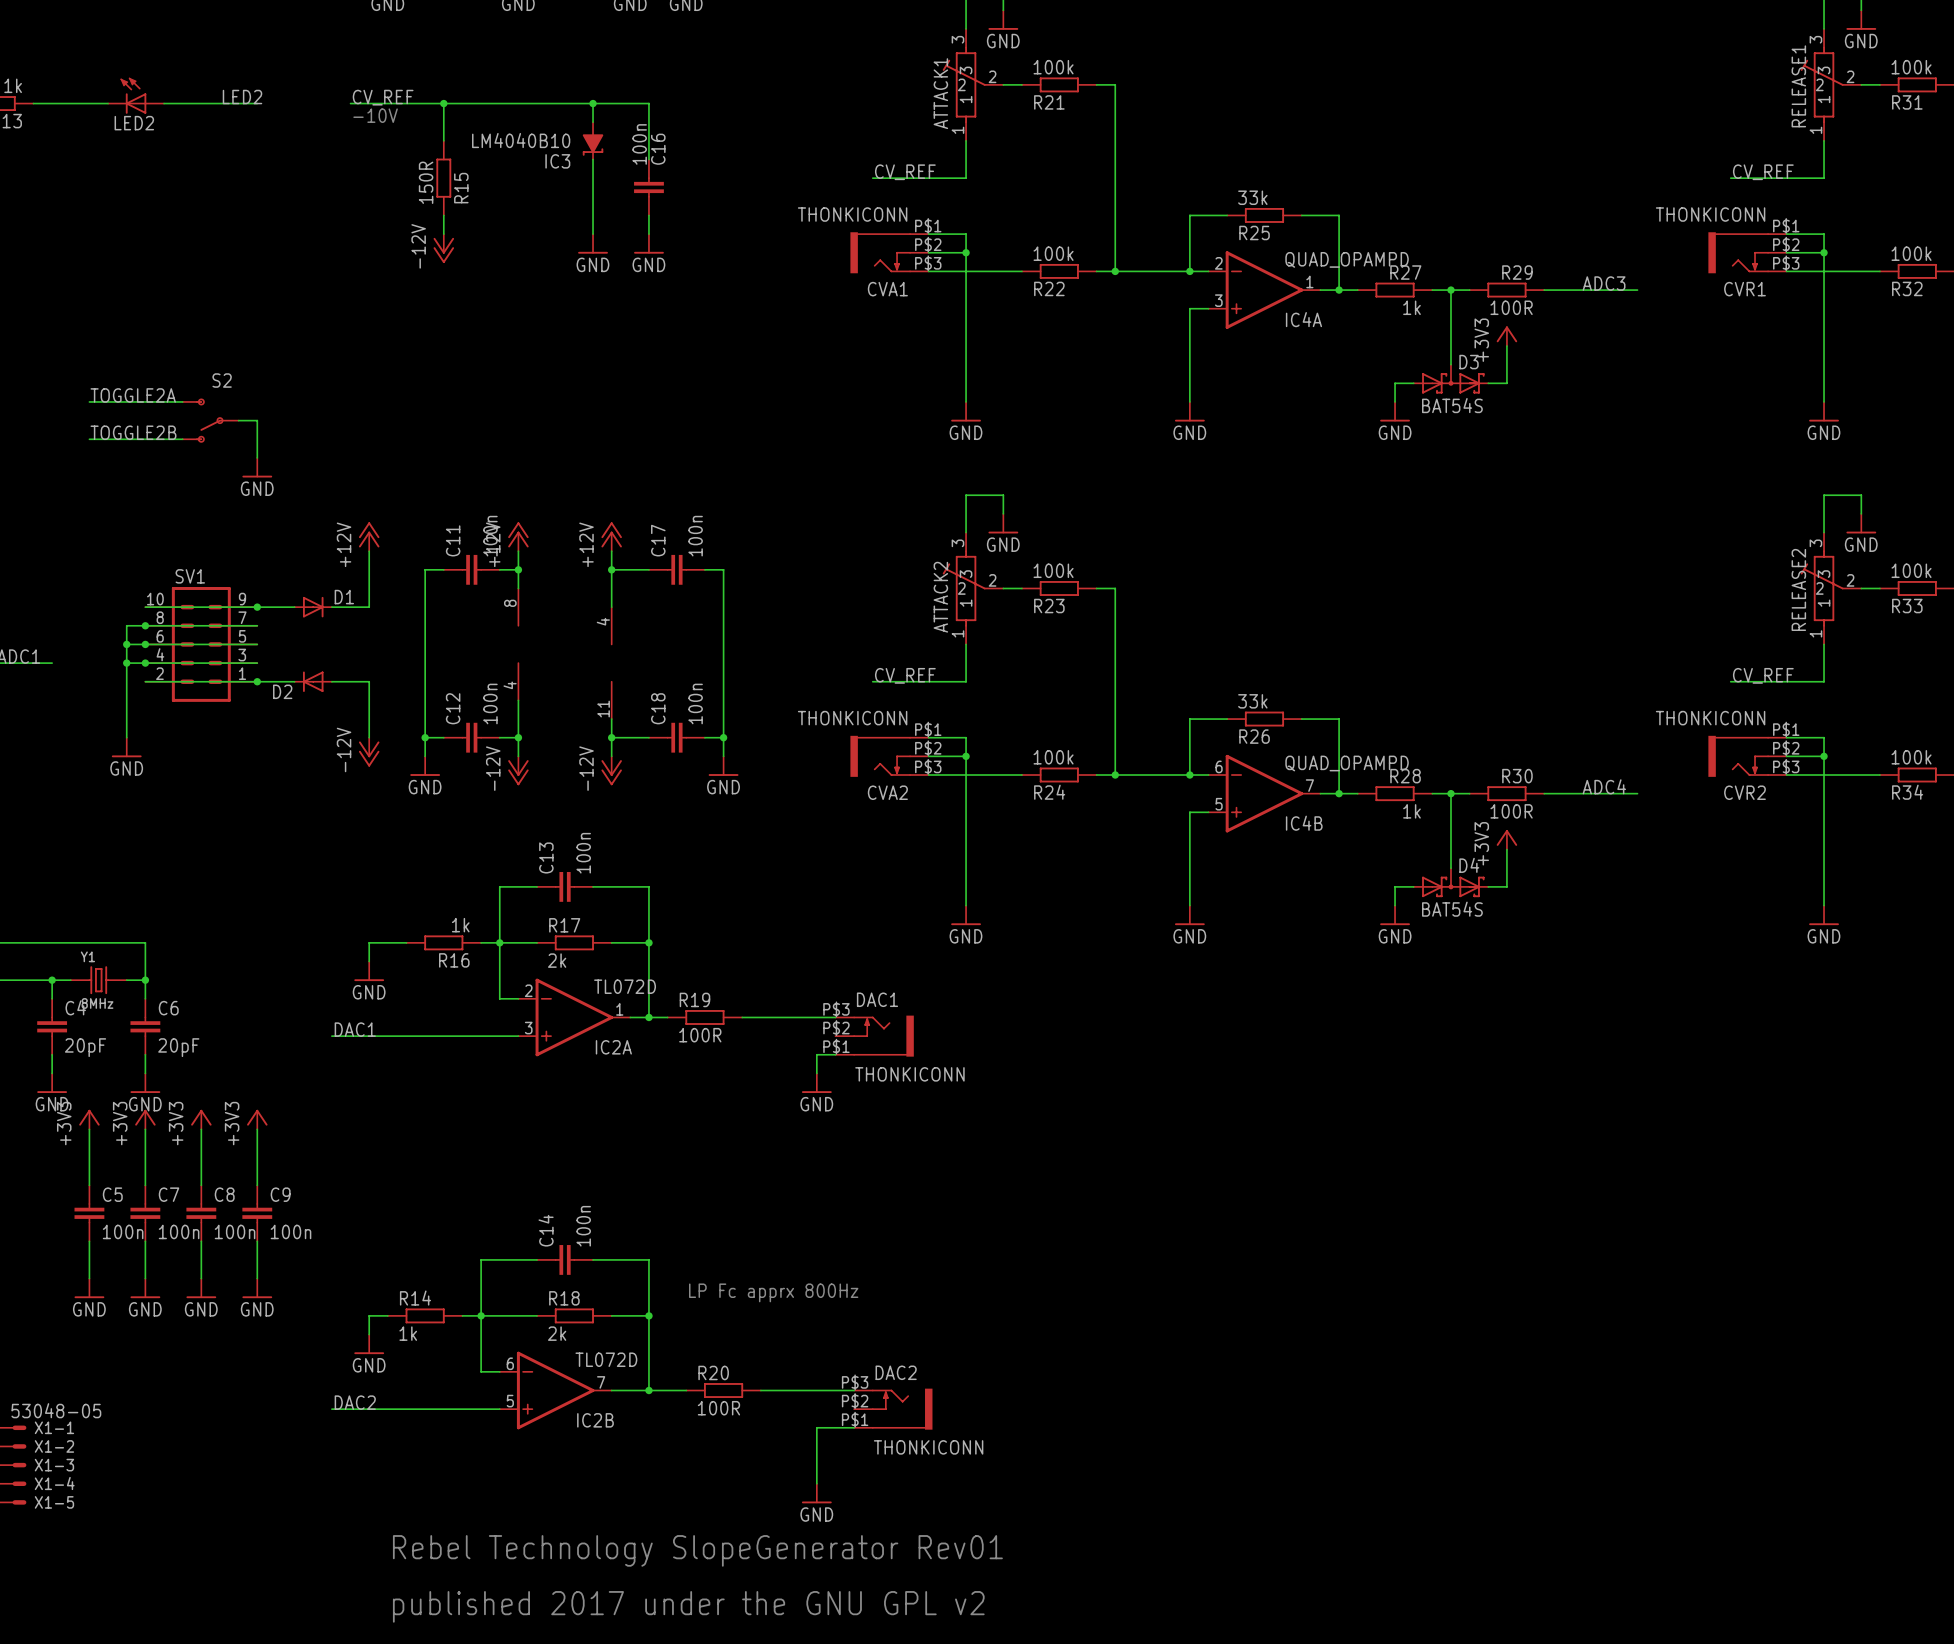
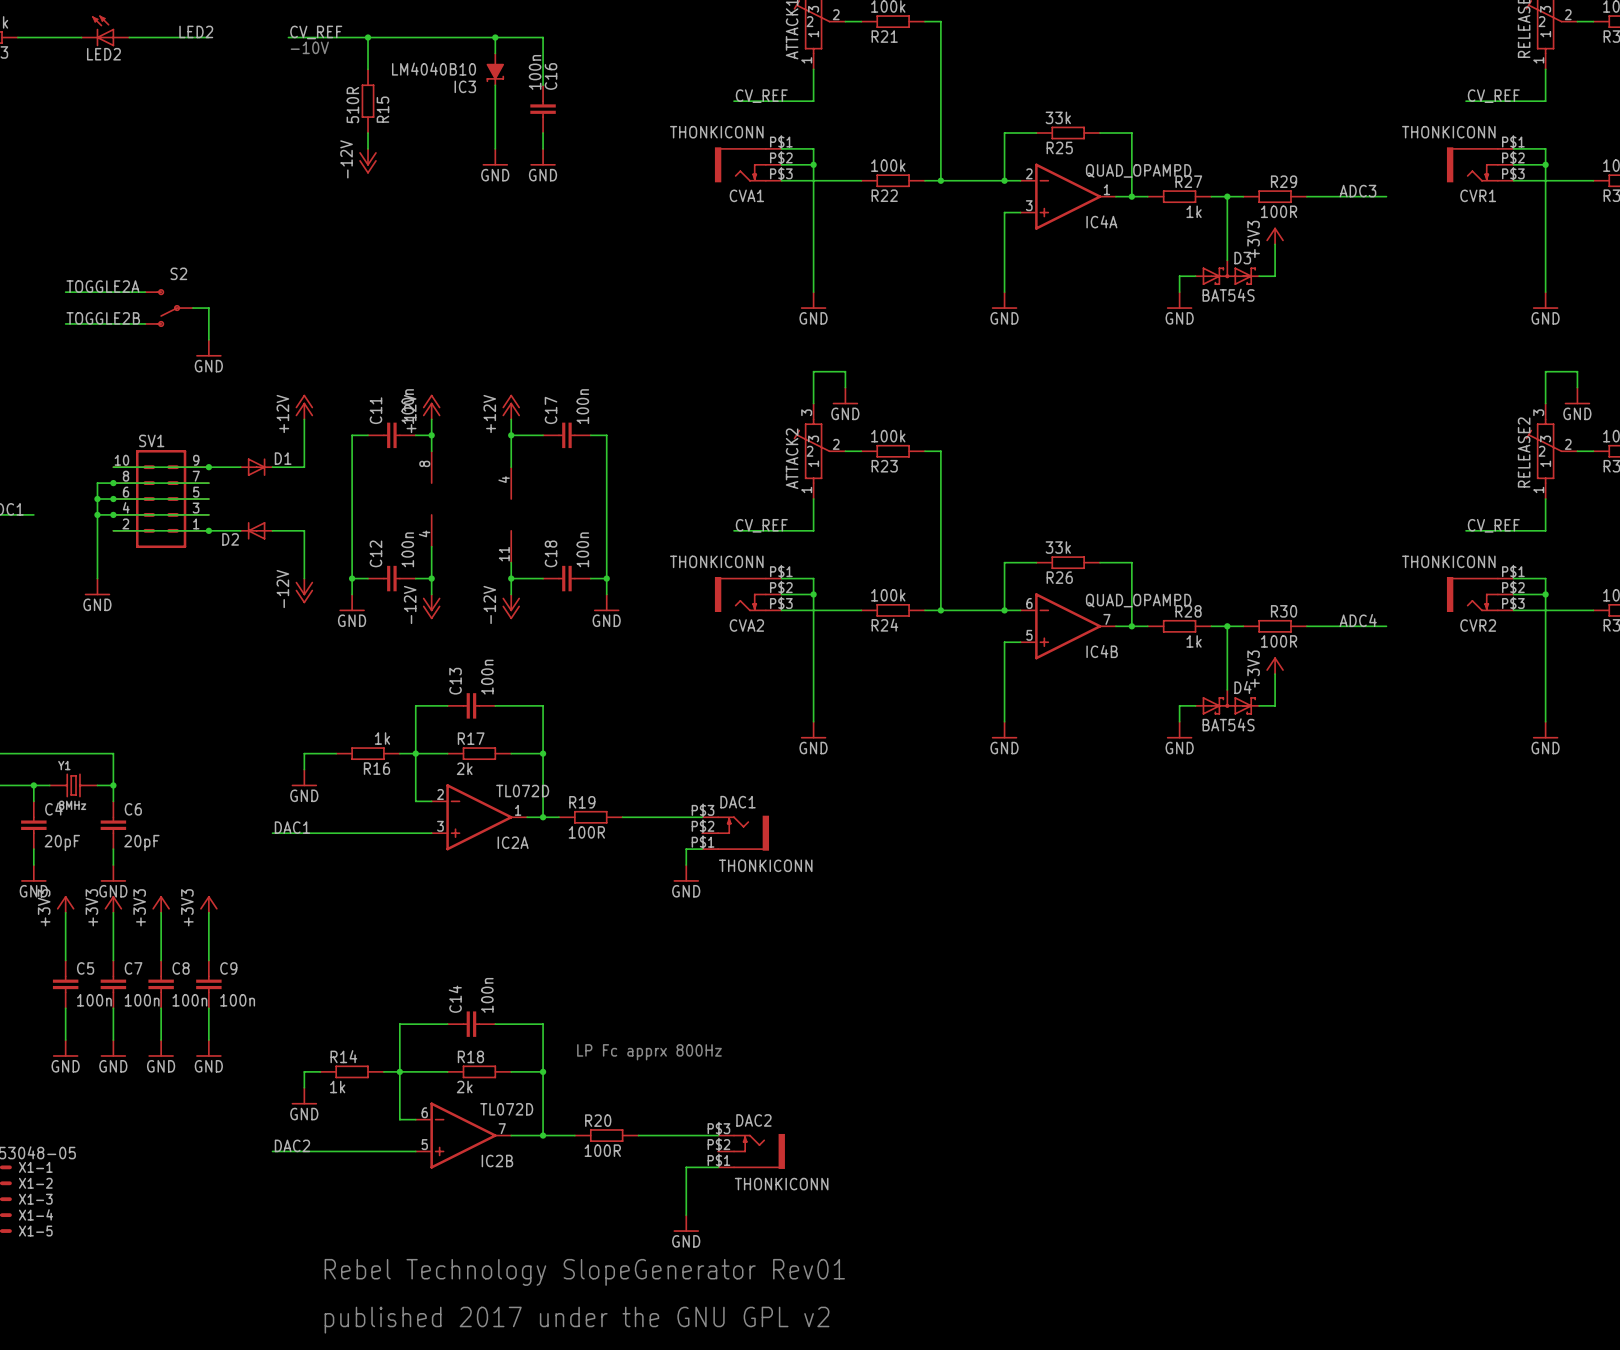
R15 value: 150R (426, 182) -> 510R (352, 105)

